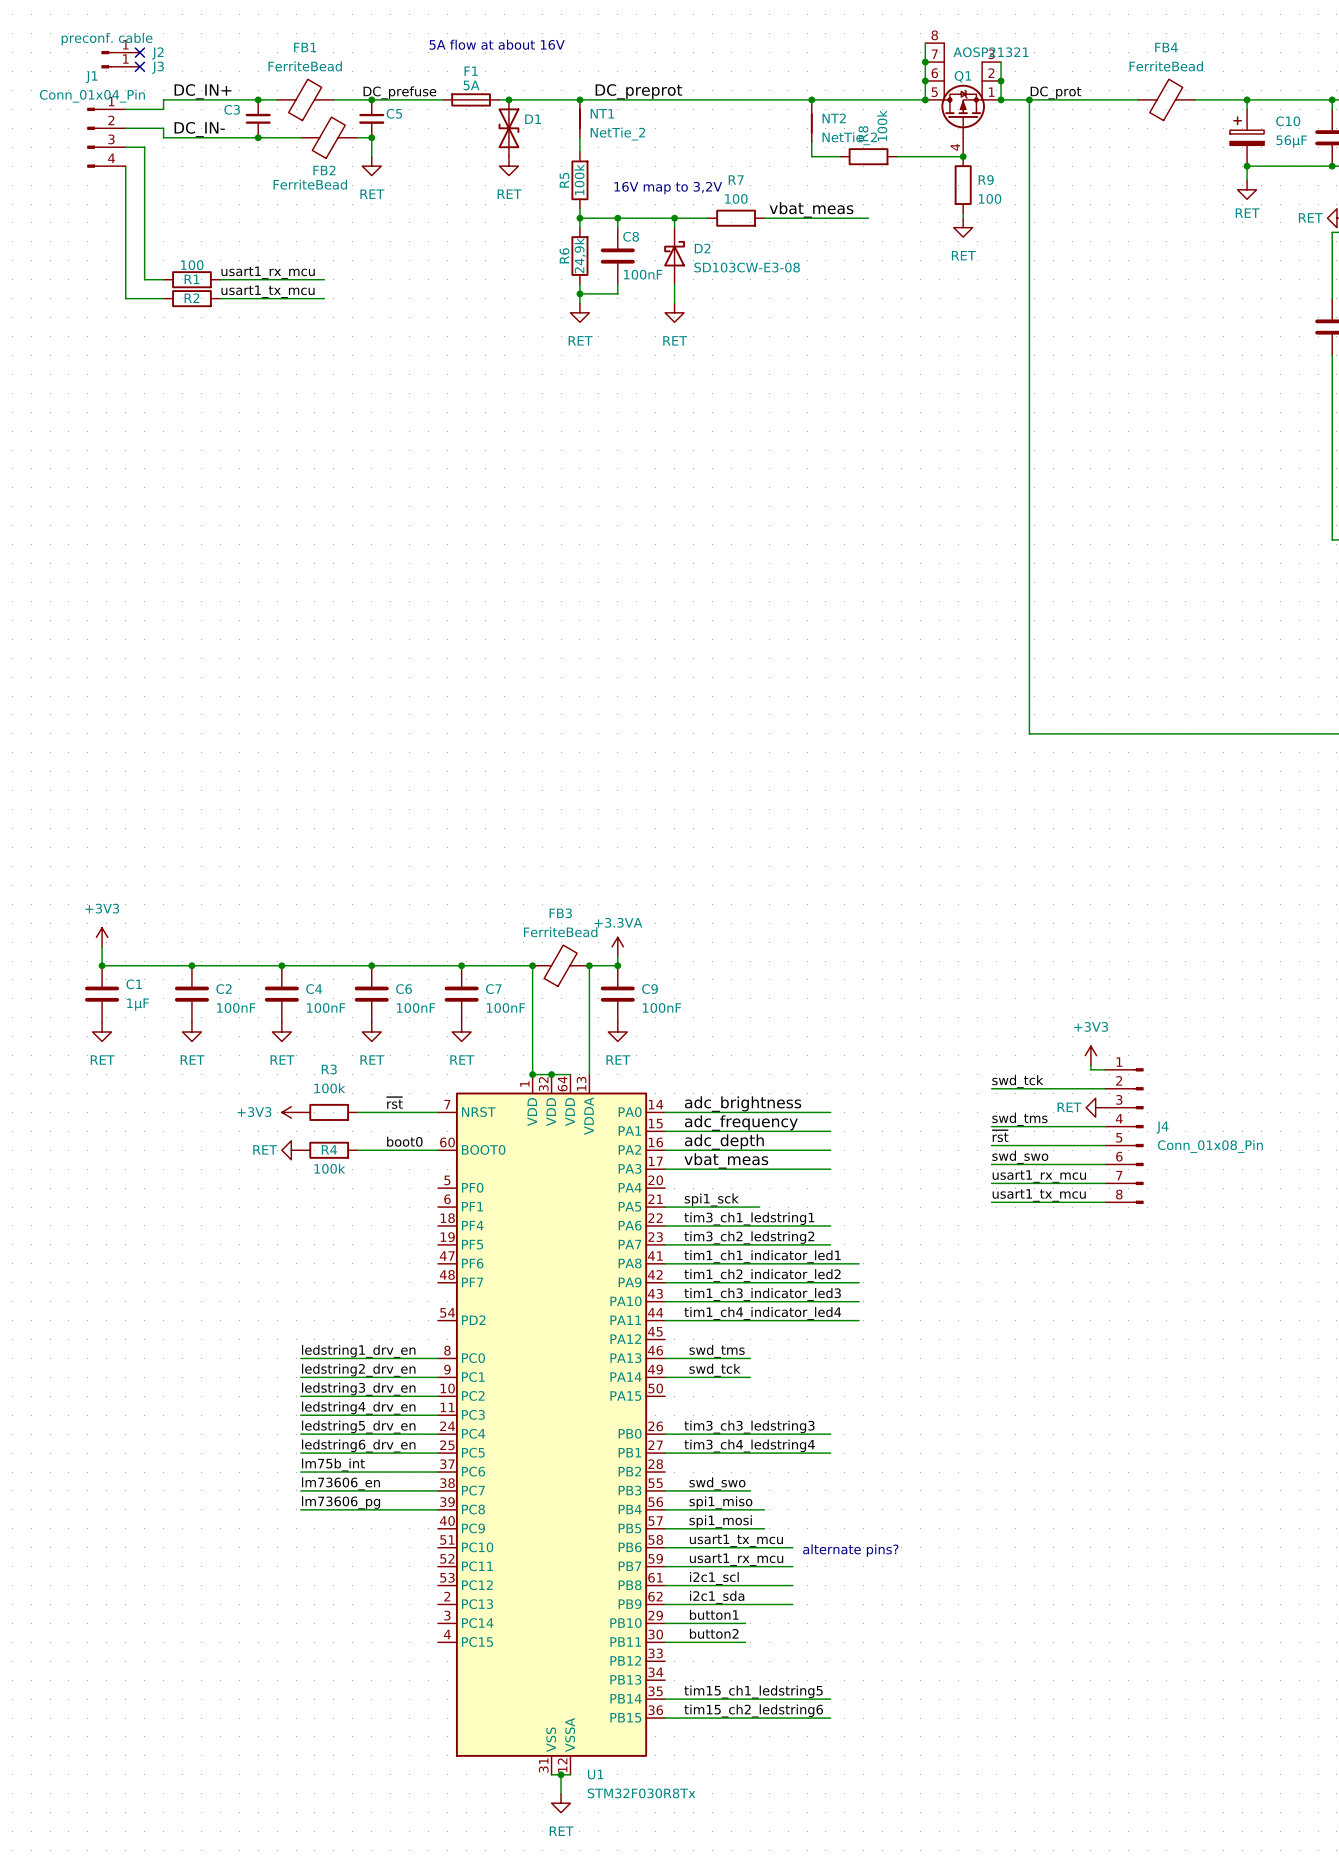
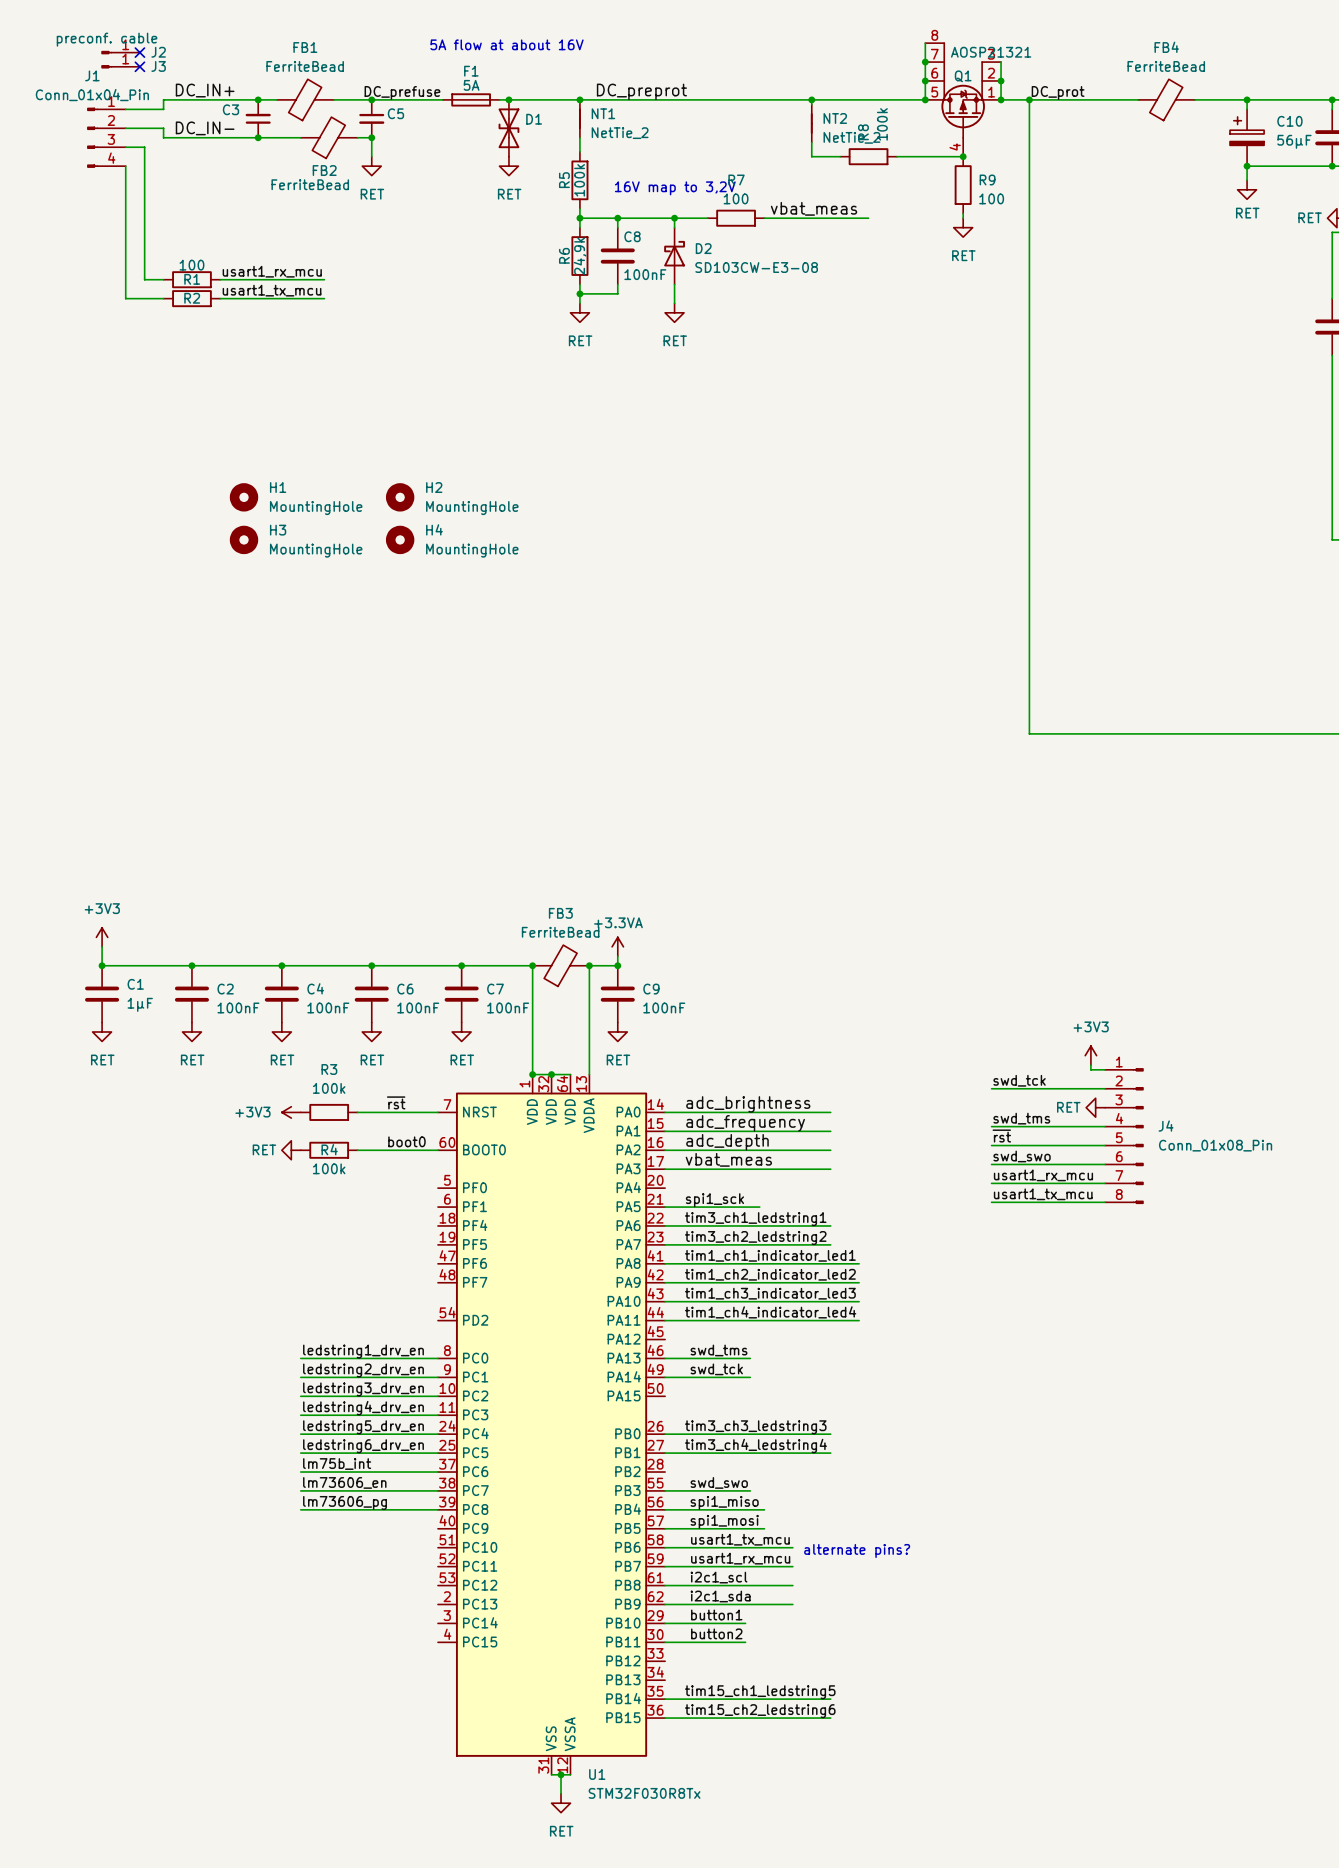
H1: none -> MountingHole (244, 497)
H2: none -> MountingHole (400, 497)
H3: none -> MountingHole (244, 539)
H4: none -> MountingHole (400, 539)

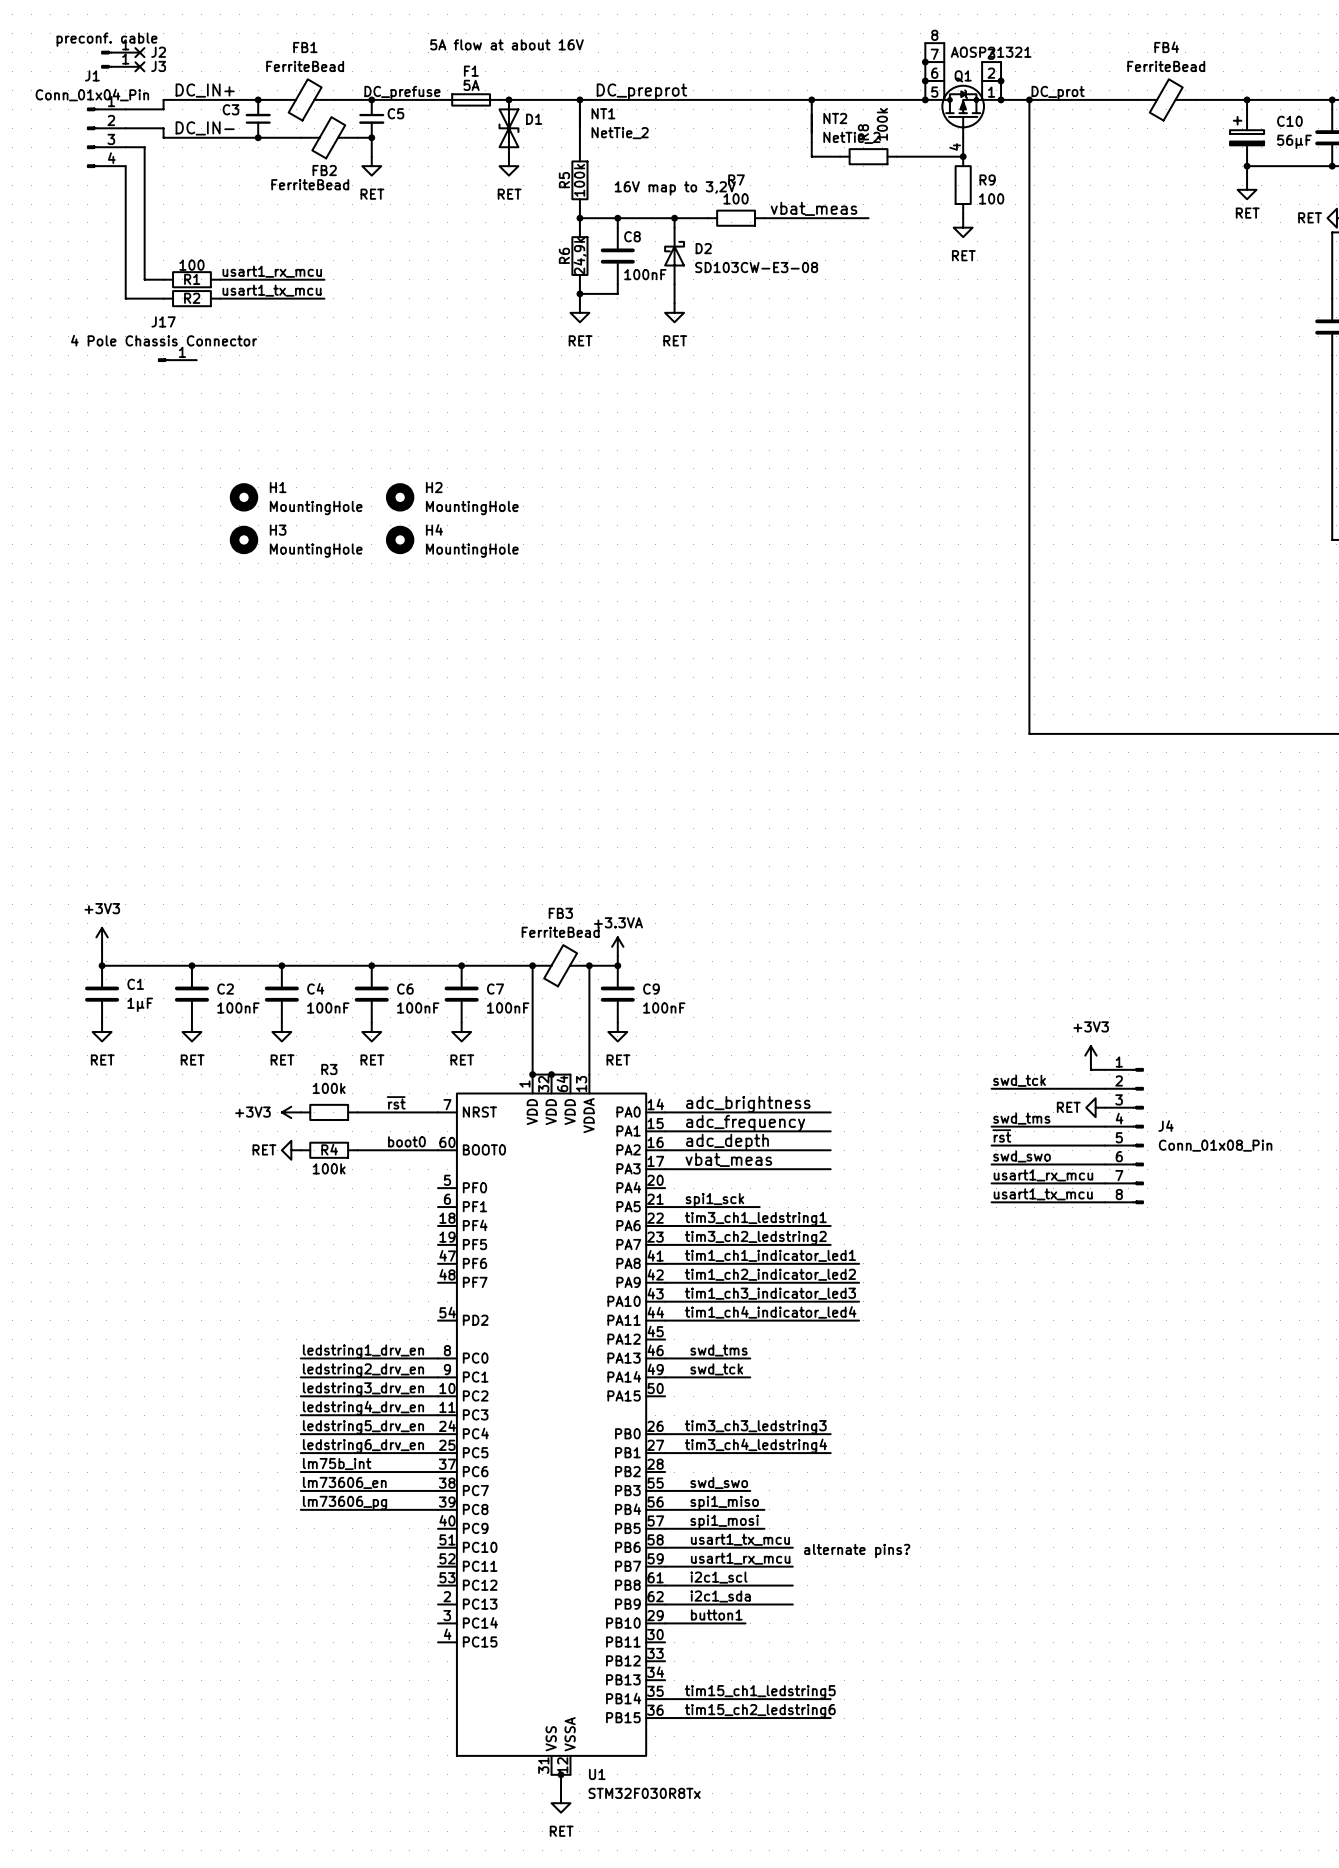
J17: none -> 4 Pole Chassis Connector (177, 360)
label: button2 (716, 1633) -> none
wire: (665, 1642) (745, 1642) -> none

